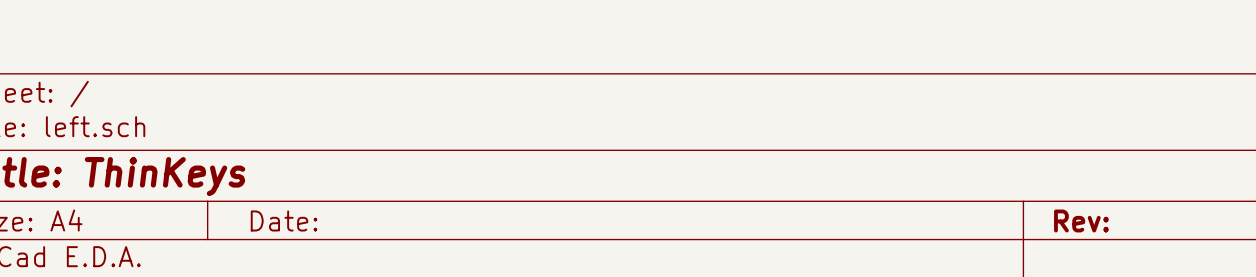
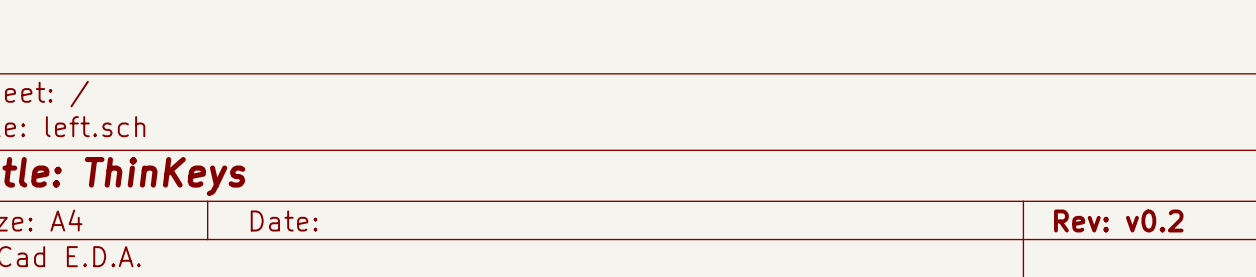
title block: Rev: (1081, 220) -> Rev: v0.2 (1118, 220)

